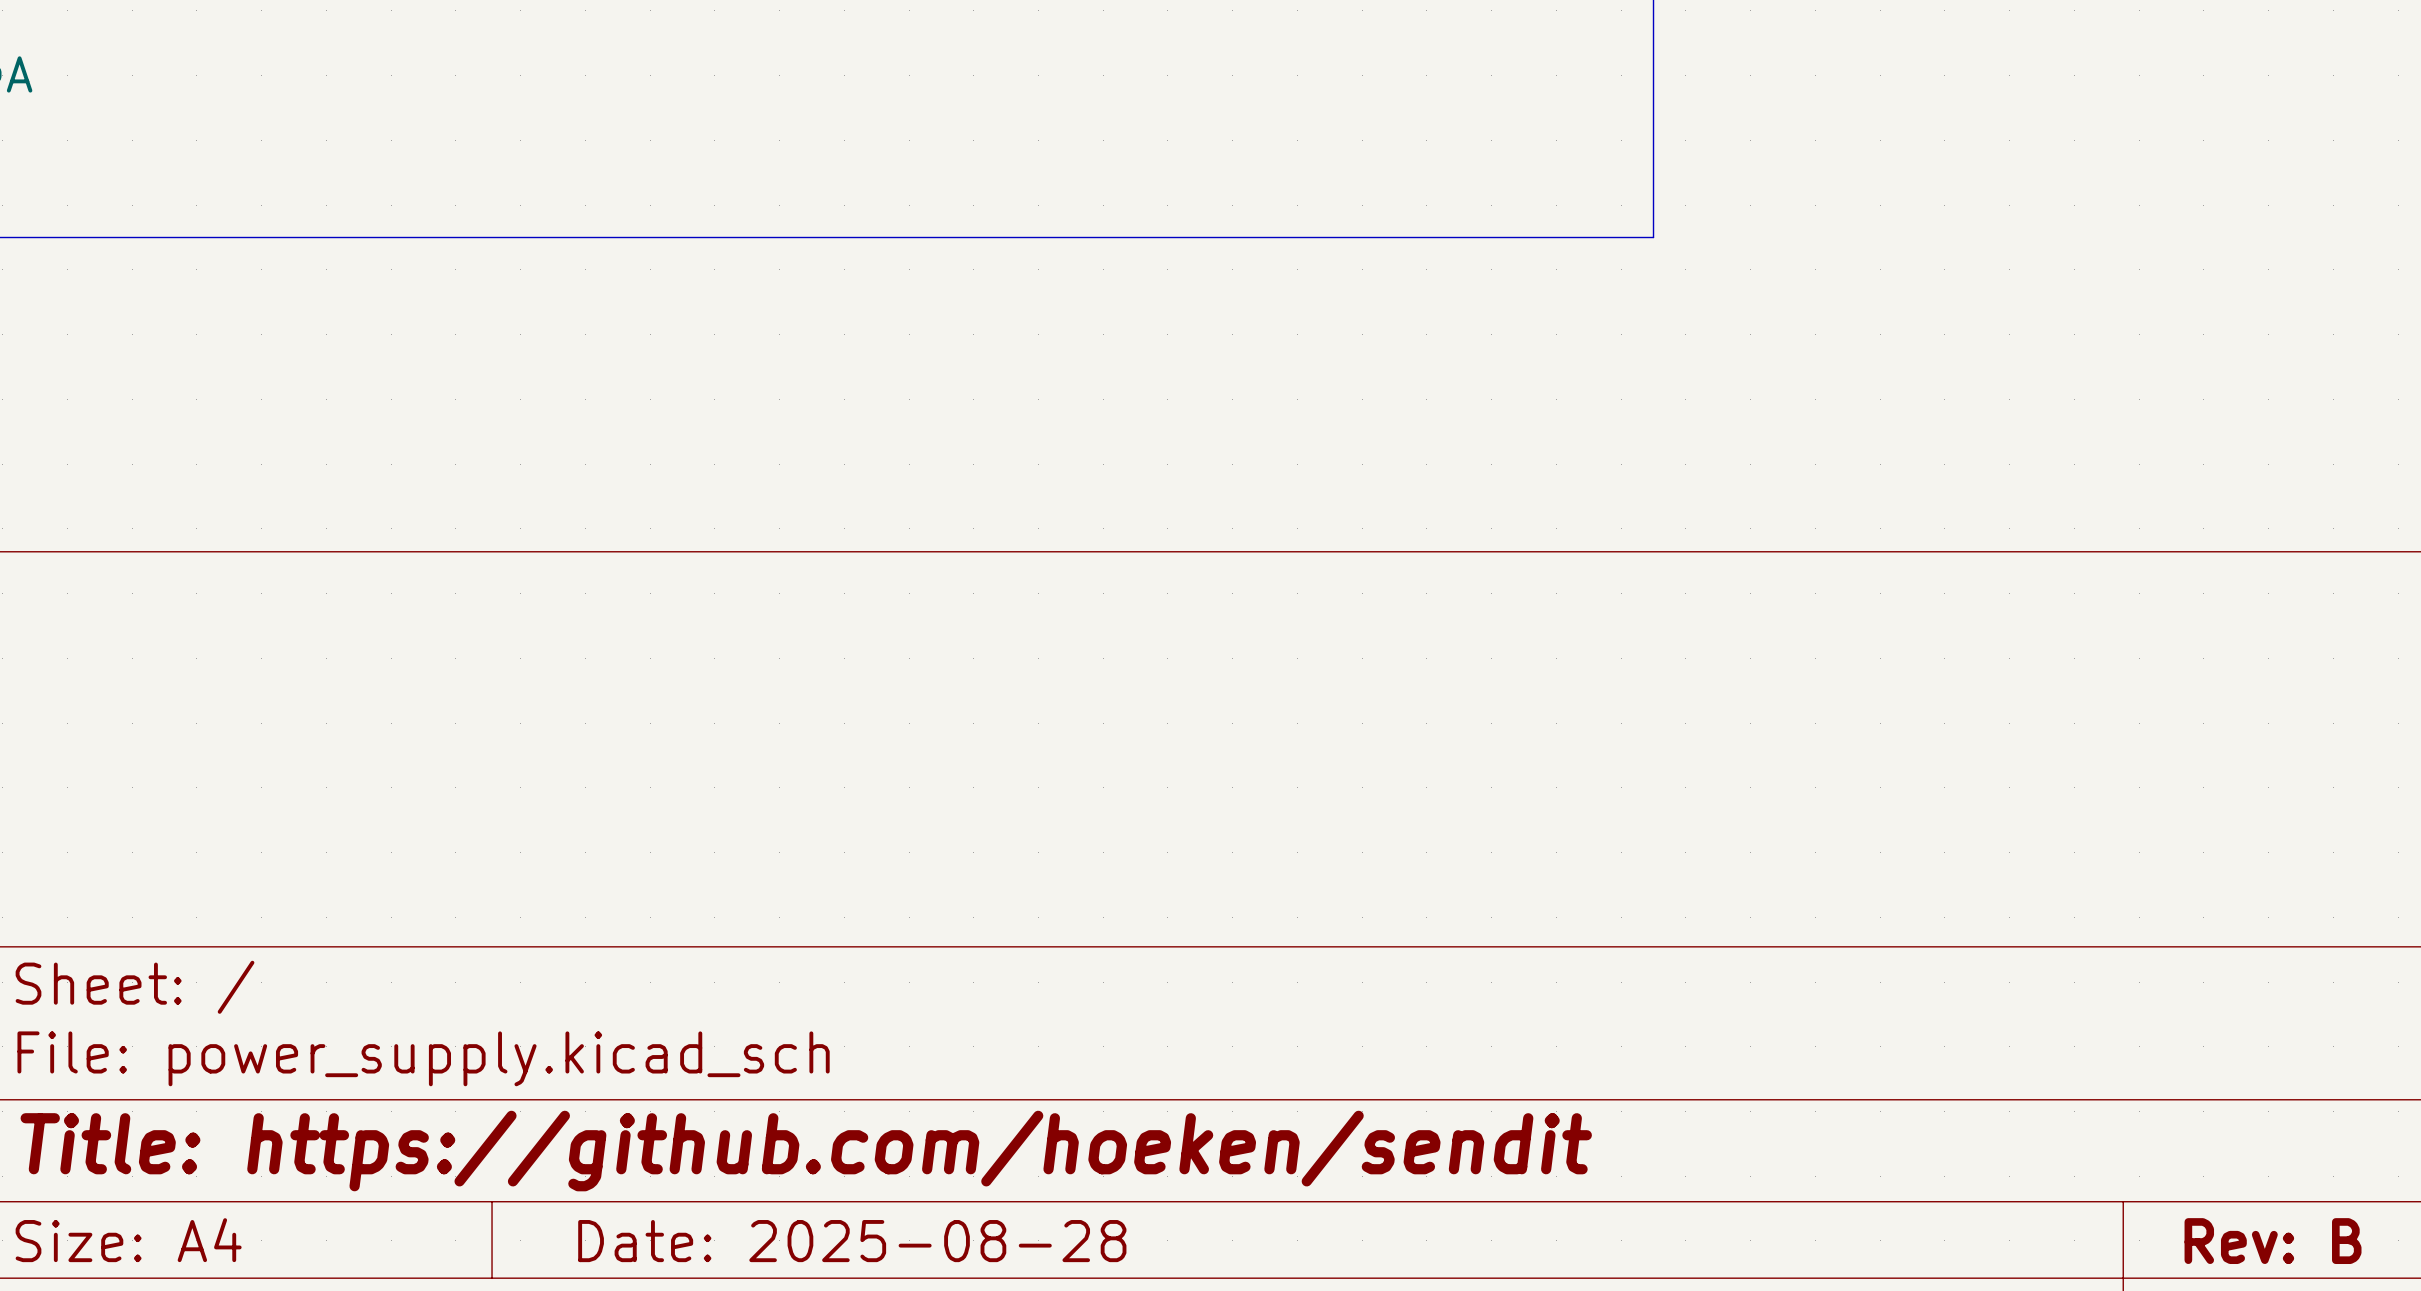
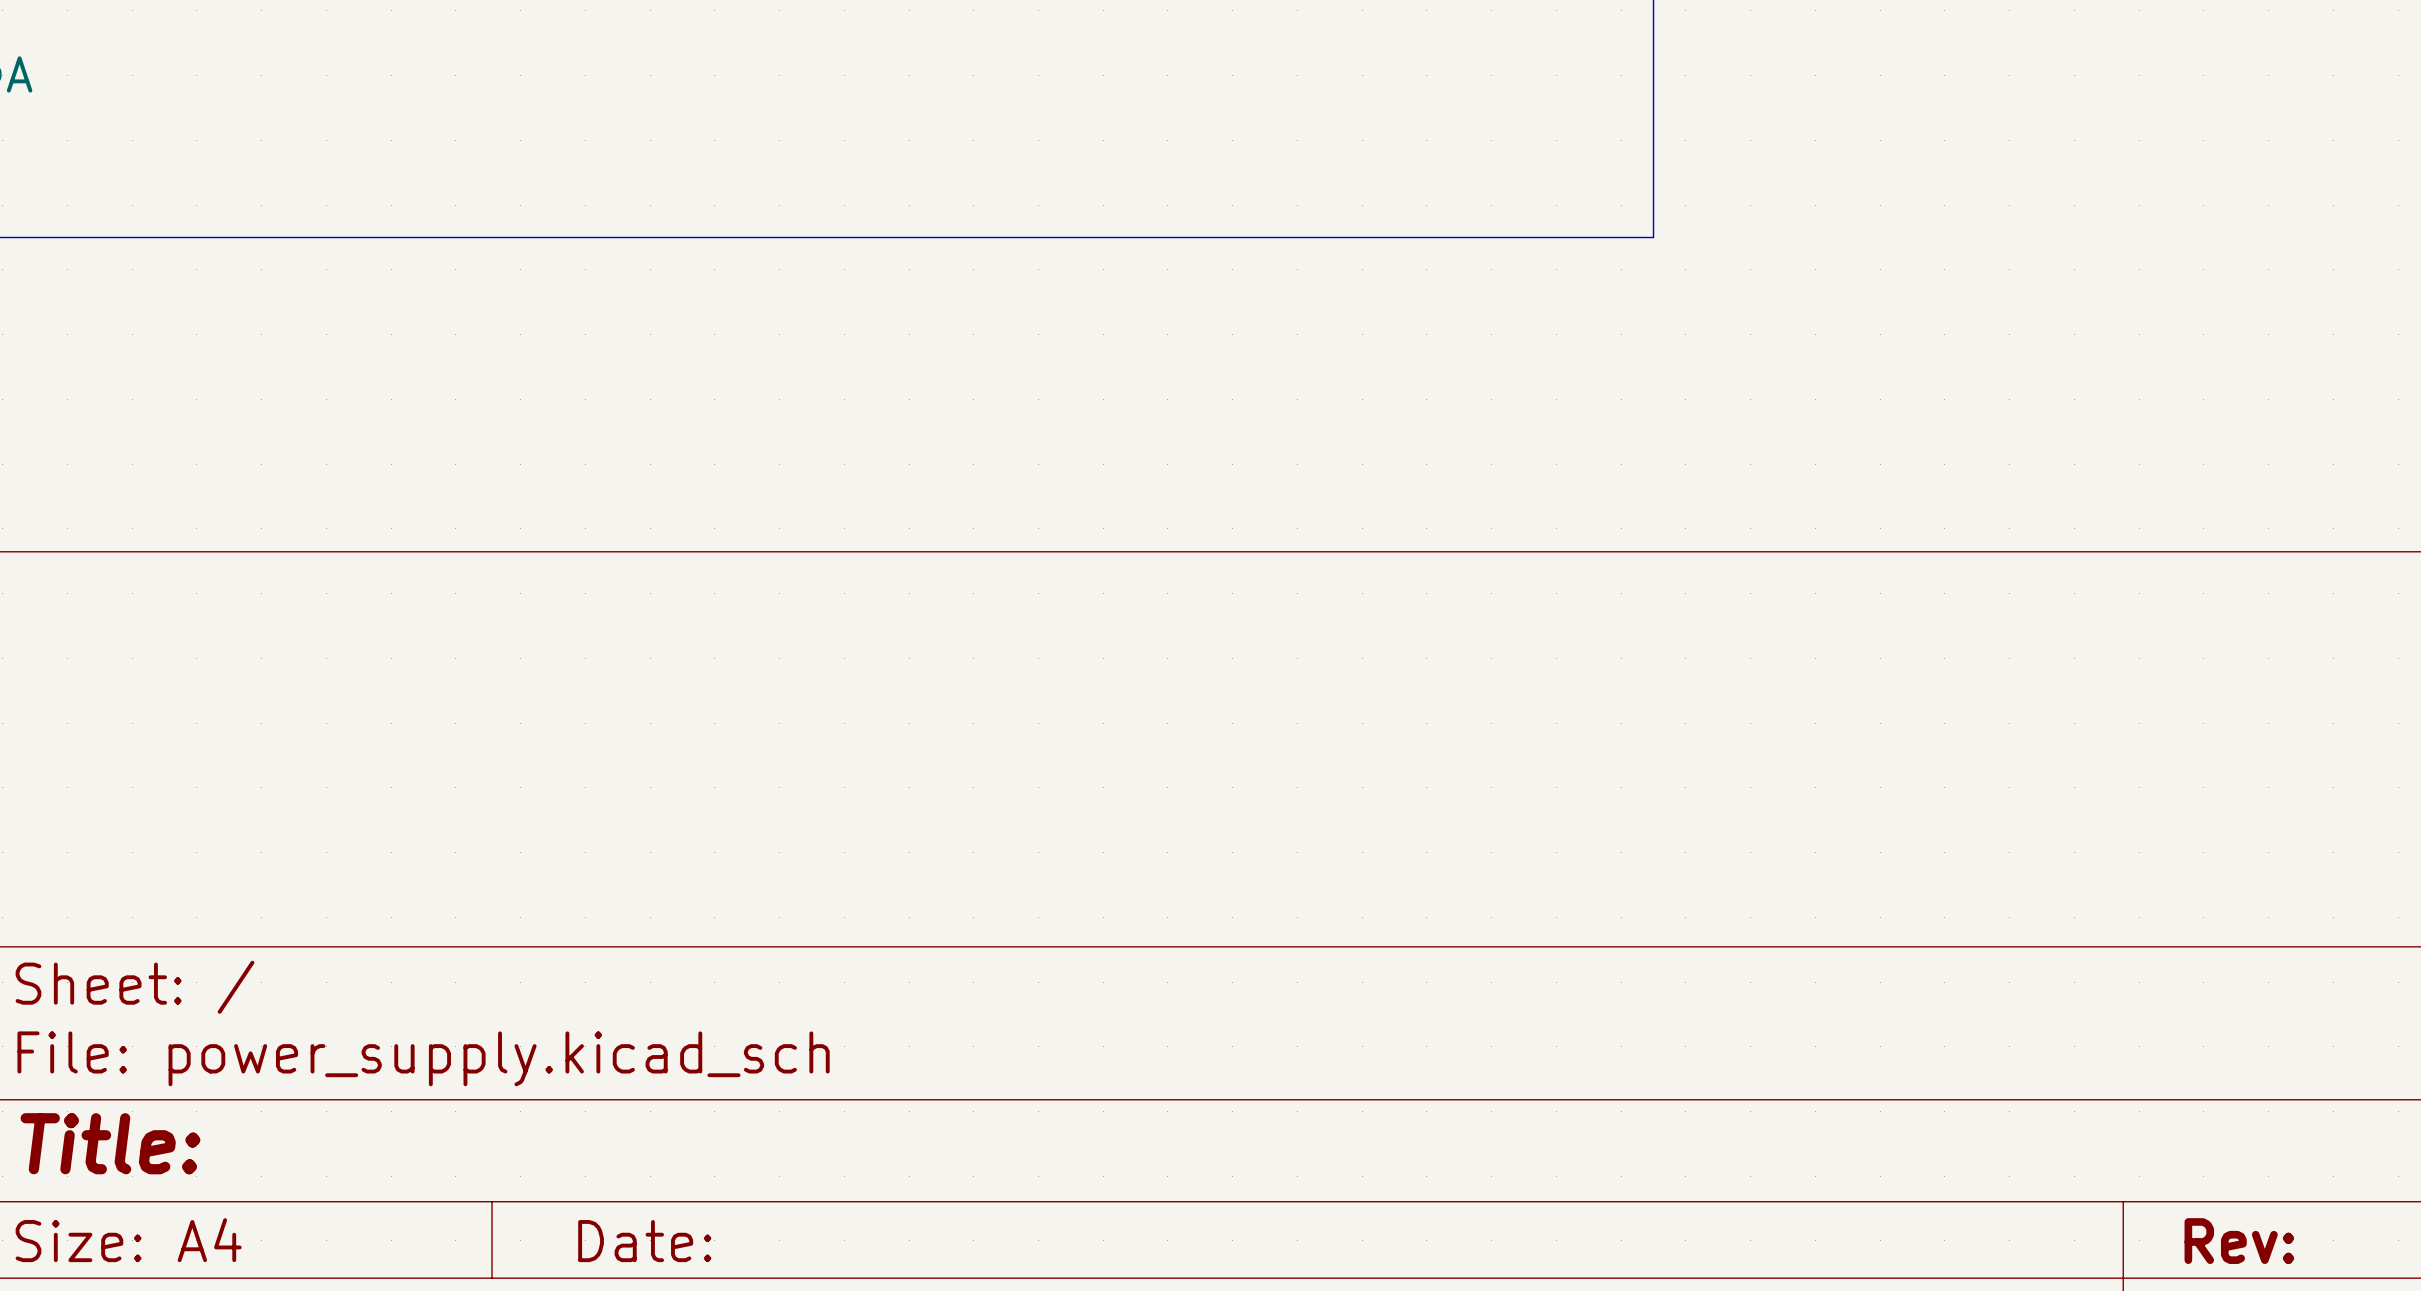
title block: Title: https://github.com/hoeken/sendit (806, 1151) -> Title: (110, 1143)
title block: Date: 2025-08-28 (852, 1241) -> Date: (644, 1241)
title block: Rev: B (2273, 1241) -> Rev: (2239, 1241)

